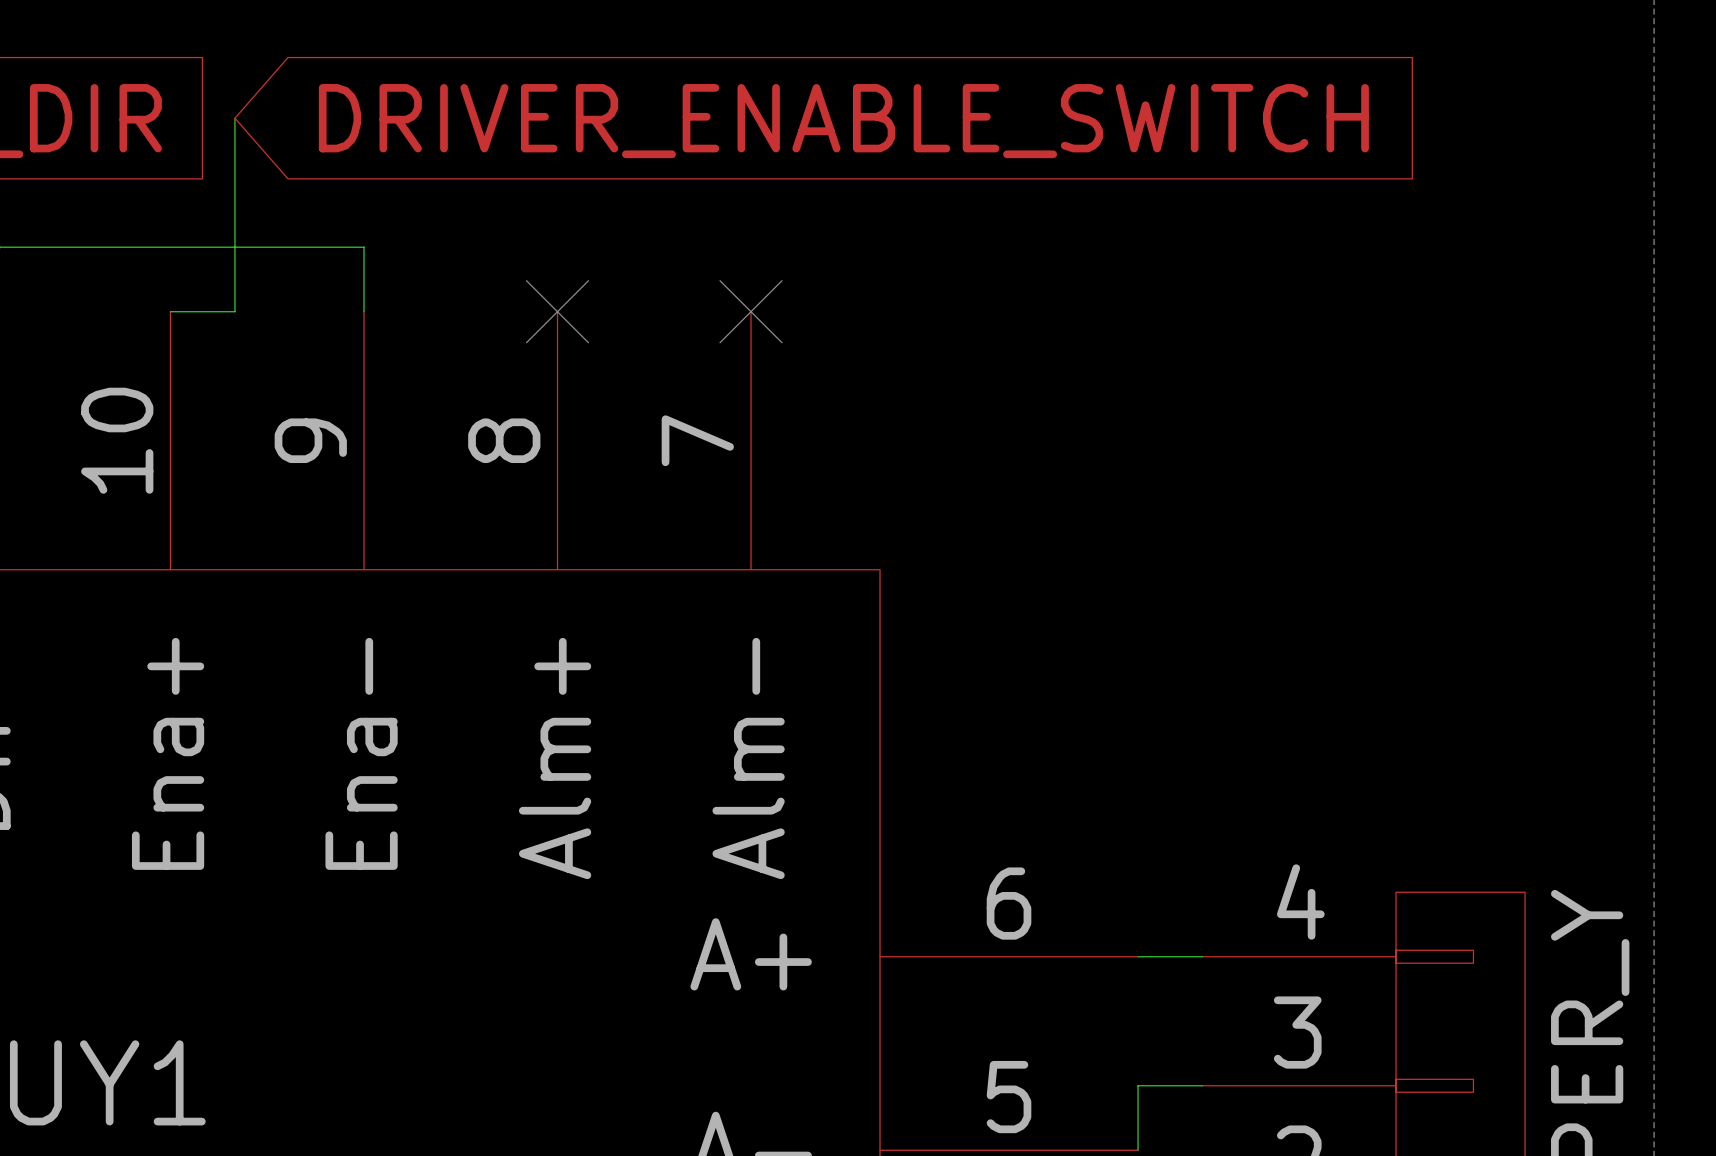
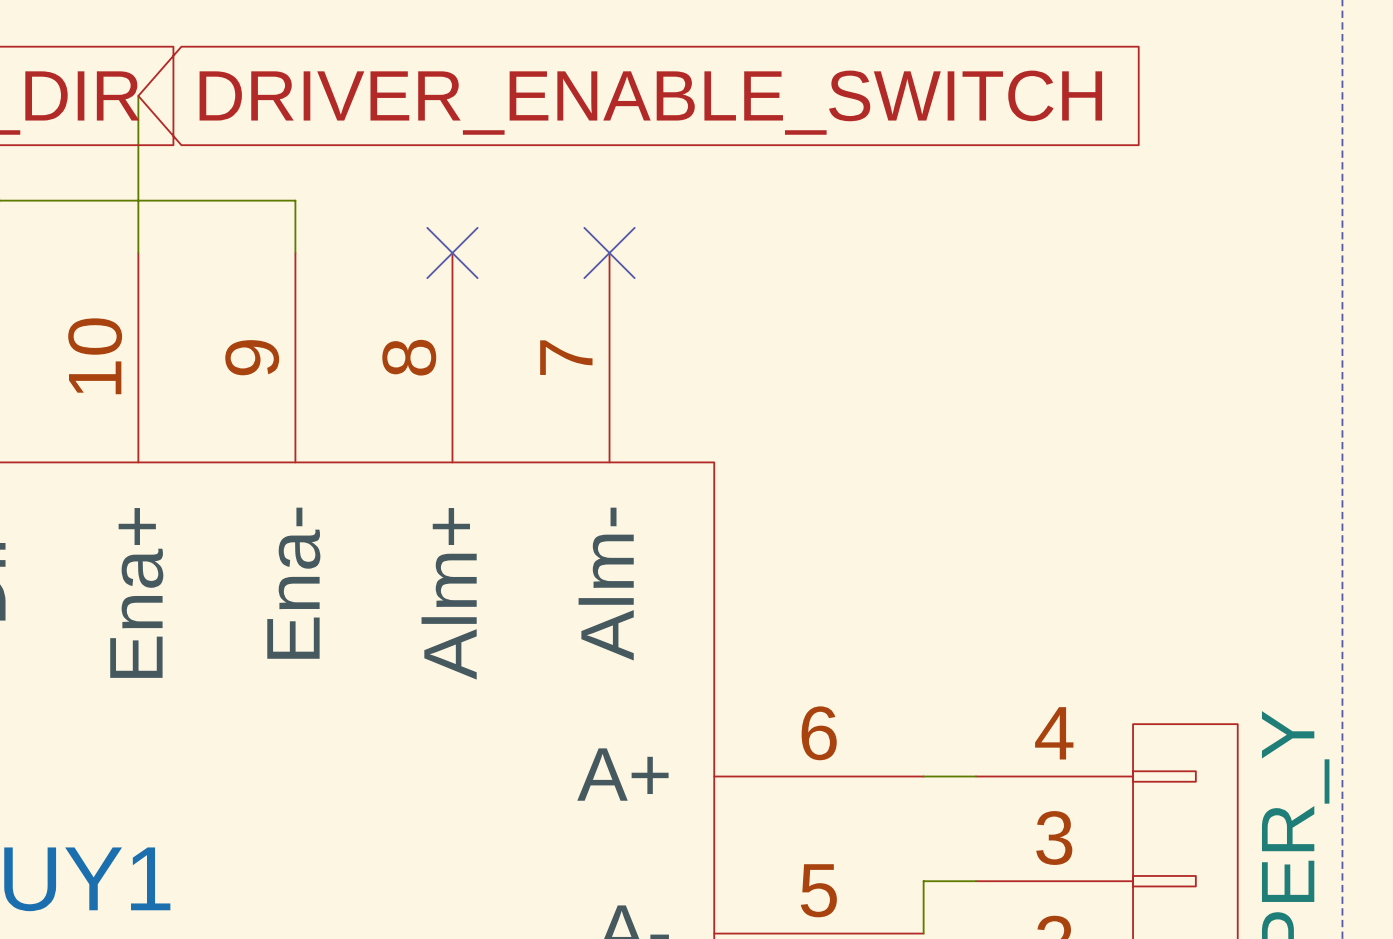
wire: (234, 118) (234, 311) (170, 311) -> (138, 95) (138, 252)
global label position: DRIVER_ENABLE_SWITCH (843, 121) -> DRIVER_ENABLE_SWITCH (650, 102)

